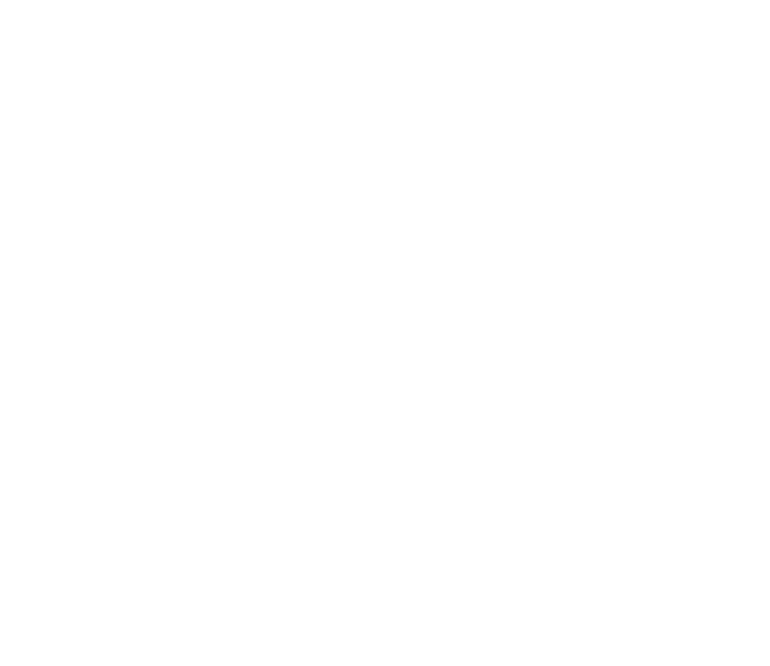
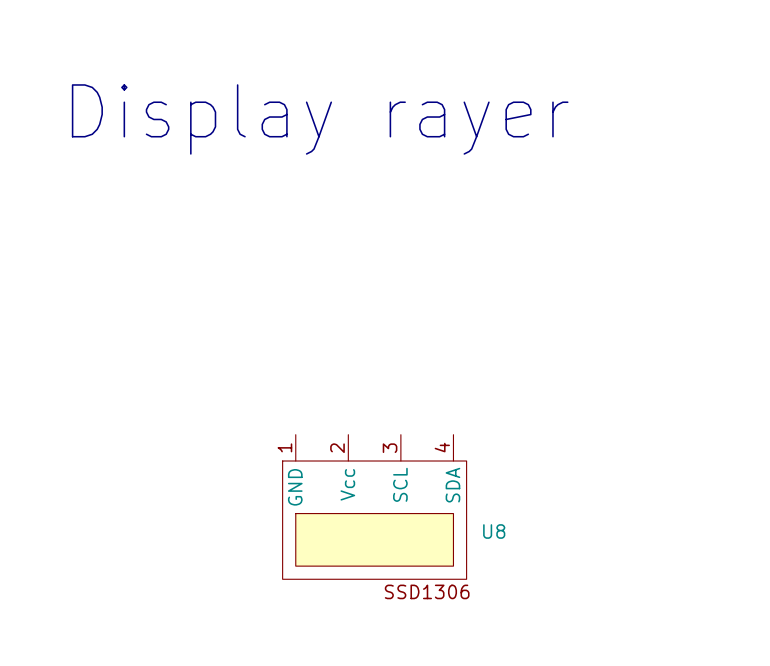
text: none -> Display rayer (320, 119)
U8: none -> (374, 507)

